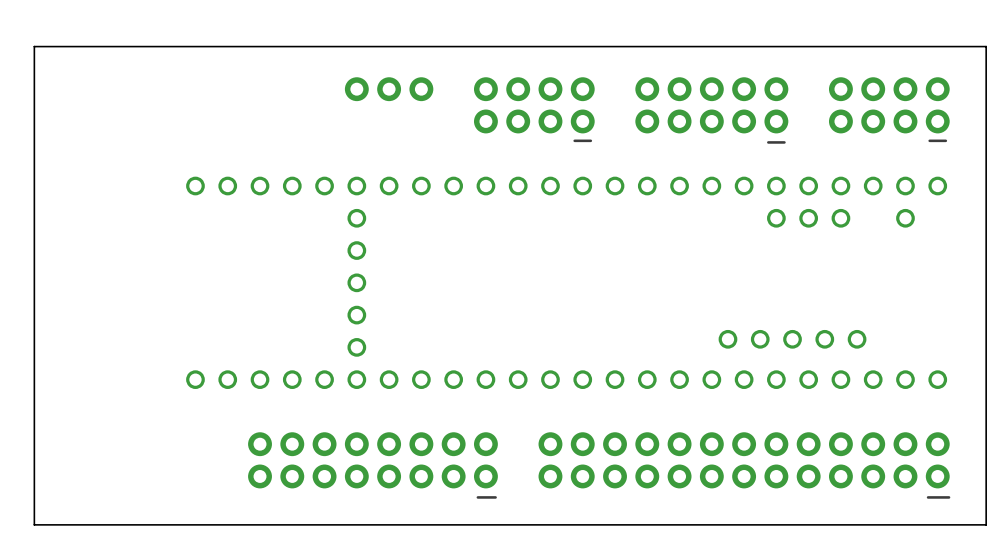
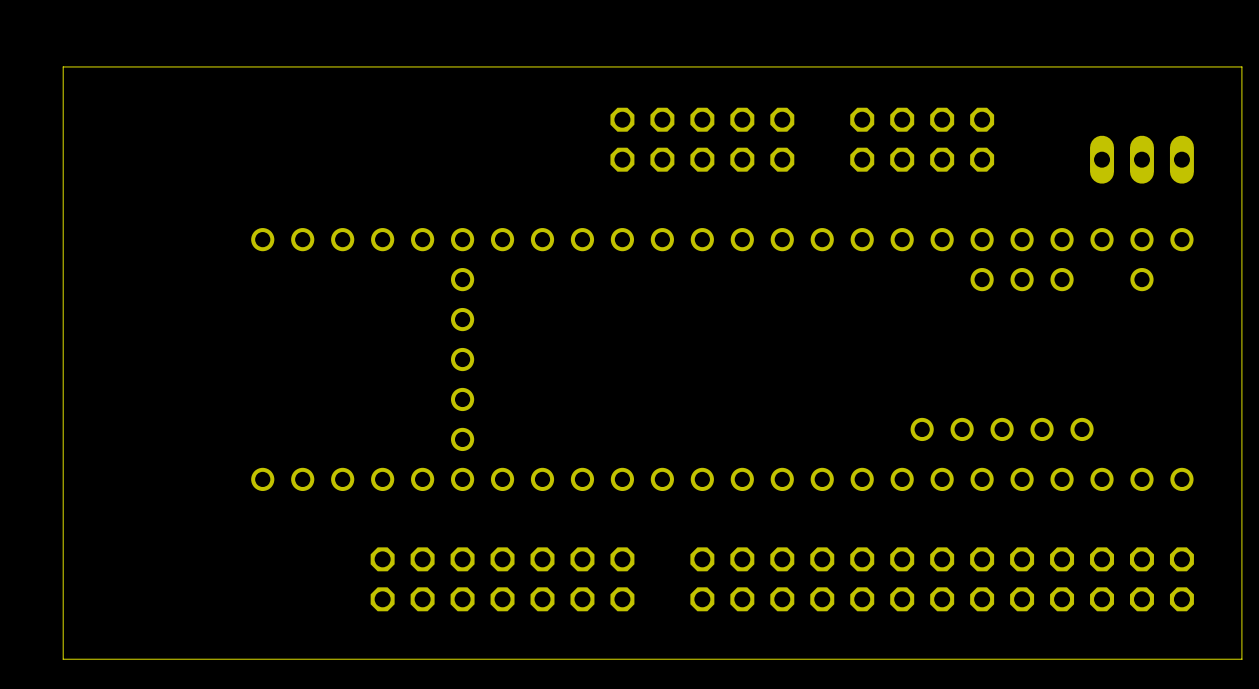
part: (389, 89) -> none
part: none -> (702, 139)
part: none -> (922, 139)
part: (534, 109) -> none
part: (889, 109) -> none
part: (711, 110) -> none
part: none -> (1141, 159)
part footprint: [538, 432, 951, 499] -> [690, 547, 1194, 612]
part: none -> (502, 579)
part: (372, 465) -> none

